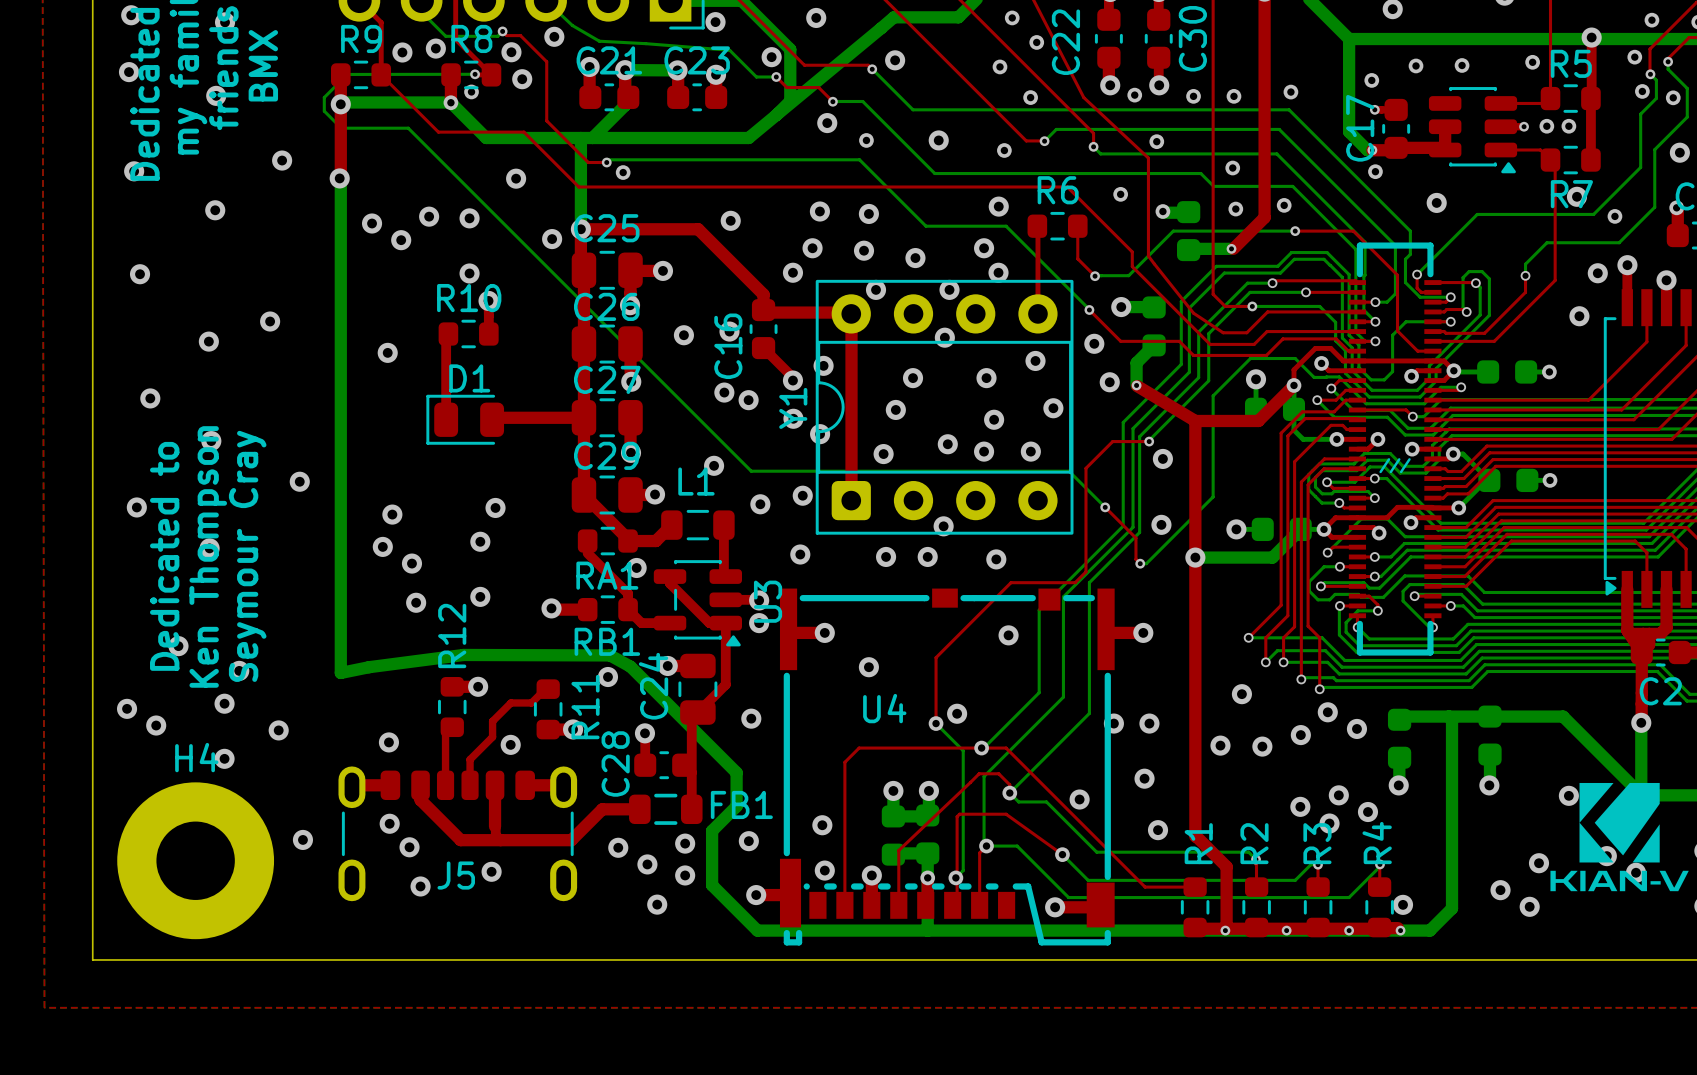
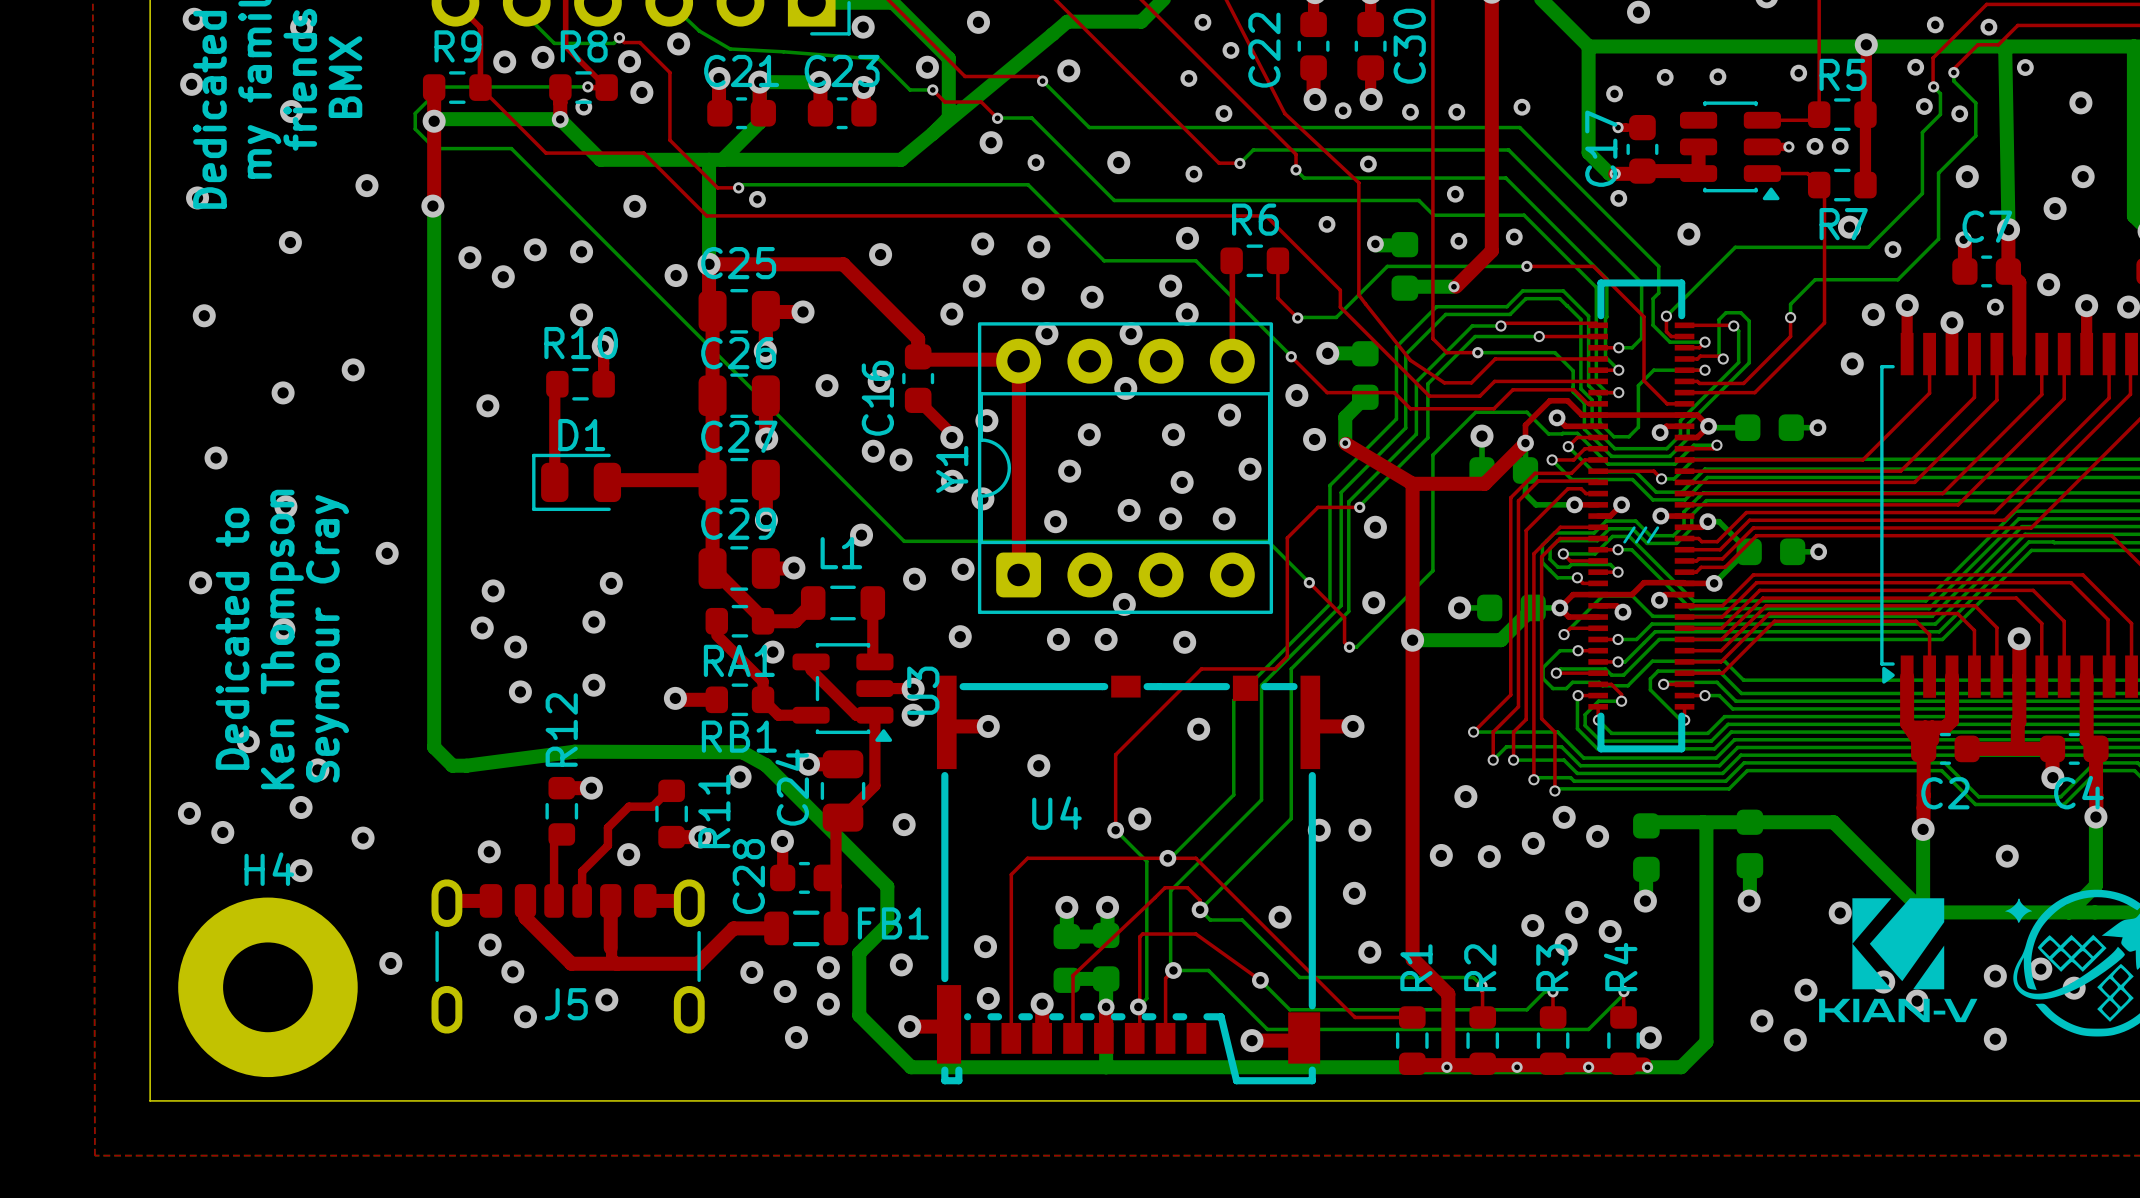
bottom track: (340, 651) (340, 672) (369, 667) -> (434, 747) (452, 765) (466, 765)

